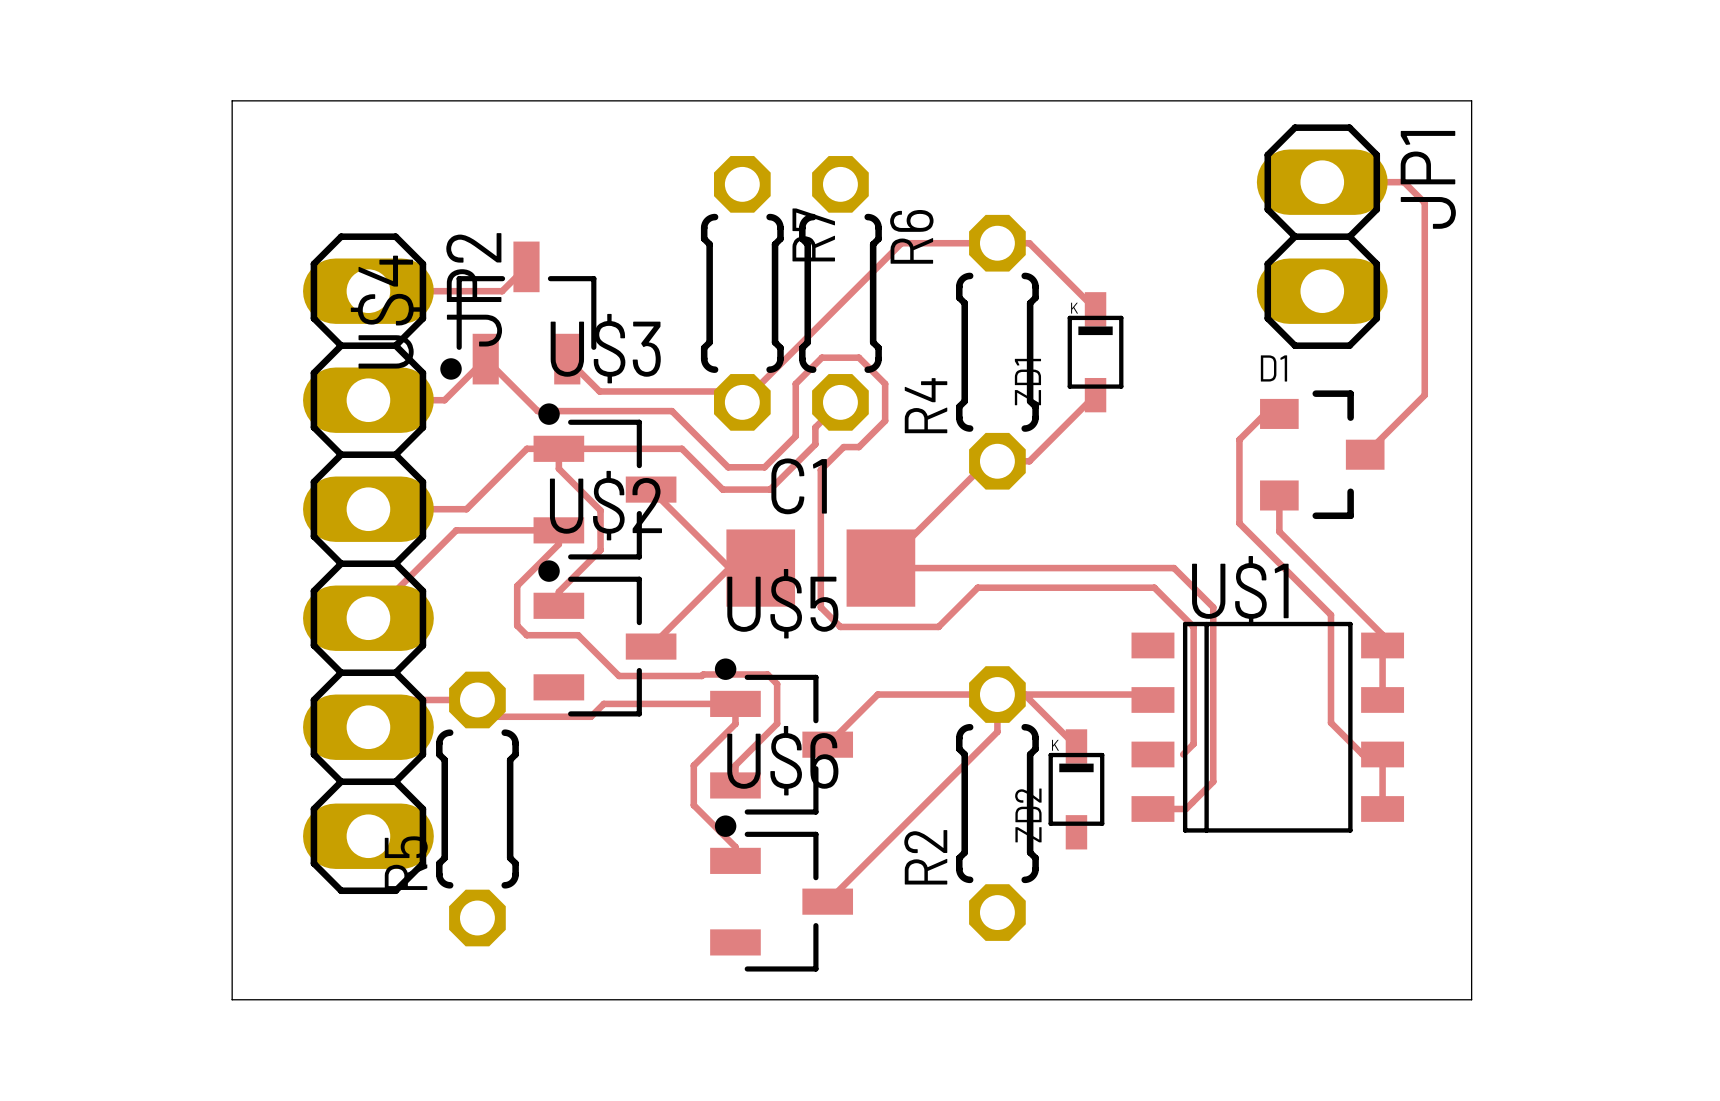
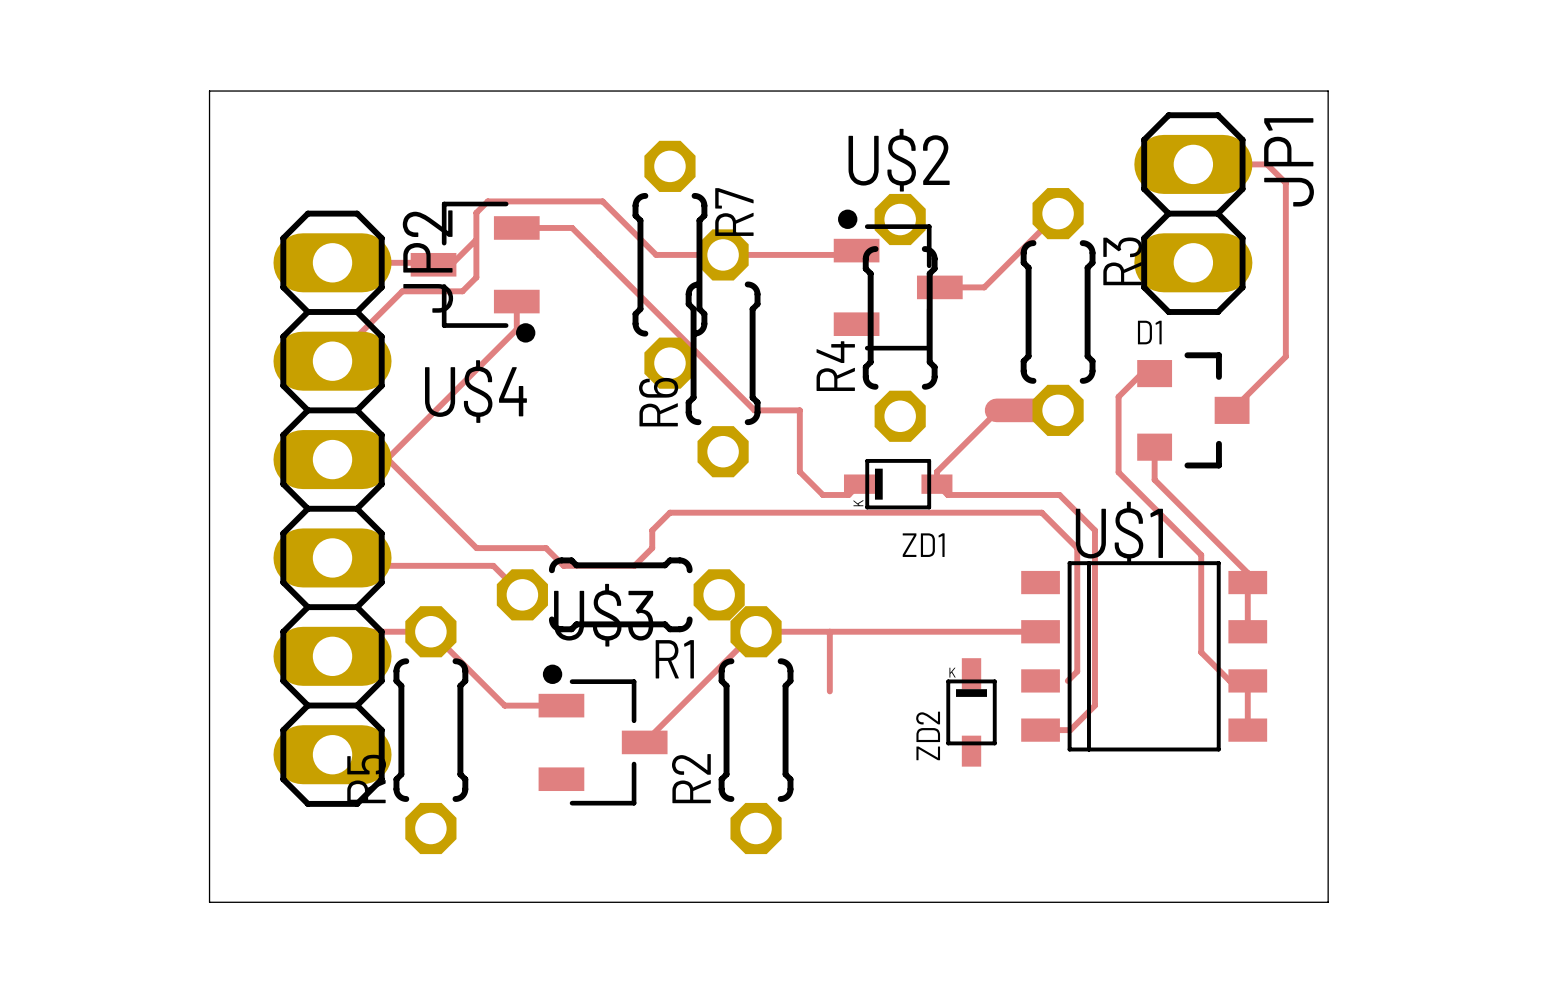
R6 name position: R6 (911, 236) -> R6 (658, 402)
track: none -> (1058, 213) (984, 287) (939, 287)
track: none -> (516, 227) (572, 227) (754, 410) (799, 410) (799, 471) (822, 494) (848, 494) (859, 484)
track: none -> (856, 250) (852, 254) (656, 254) (602, 201) (487, 201) (476, 212) (476, 277) (462, 291) (402, 291) (332, 361) (332, 354)
R6 position: (840, 293) -> (723, 353)
track: (1095, 309) (1029, 243) (901, 243) (742, 402) (731, 391) (599, 391) (567, 359) -> none
U$4 rotation: 0° (518, 312) -> 90° counterclockwise (475, 272)
track: none -> (516, 301) (516, 329) (386, 459)
R3: none -> (1058, 311)
ZD1 rotation: 0° (1095, 352) -> 90° counterclockwise (898, 484)
ZD1 position: (1095, 352) -> (898, 484)
track: (1095, 395) (1029, 461) (987, 461) (880, 568) -> (686, 512) (795, 512)
track: (368, 400) (444, 400) (485, 359) (537, 411) (671, 411) (728, 467) (764, 467) (795, 436) (795, 383) (821, 357) (858, 357) (885, 383) (885, 420) (858, 447) (843, 447) (820, 469) (820, 607) (840, 626) (938, 626) (977, 587) (1154, 587) (1193, 626) -> none
track: (840, 402) (815, 427) (815, 444) (770, 489) (722, 489) (681, 448) (526, 448) (466, 509) (429, 509) -> (669, 512) (652, 530) (652, 548) (634, 565) (563, 565) (546, 548) (476, 548) (388, 459)
track: (558, 448) (558, 468) (600, 510) (600, 550) (558, 591) (558, 605) -> none
track: none -> (1058, 410) (996, 410) (936, 471) (936, 484) (947, 494) (1059, 494) (1094, 530) (1094, 548)
U$3 position: (604, 481) -> (603, 735)
track: (651, 489) (729, 568) -> none
track: (729, 568) (651, 646) -> none
C1: (820, 568) -> none
track: (1154, 568) (1174, 568) (1213, 607) -> (1041, 512) (1077, 548) (1077, 565)
track: none -> (332, 557) (368, 557) (376, 565) (493, 565) (522, 594)
track: (368, 625) (368, 618) (456, 530) (558, 530) (558, 544) (517, 585) (517, 625) (526, 635) (578, 635) (619, 675) (767, 674) (777, 684) (777, 723) (735, 765) (735, 785) -> none
U$2 position: (604, 638) -> (898, 280)
R1: none -> (620, 594)
track: (997, 694) (997, 731) (827, 901) -> none
track: (1024, 694) (1076, 746) -> none
track: none -> (829, 631) (829, 691)
track: (1152, 699) (1147, 694) (877, 694) (827, 744) -> (1040, 631) (755, 631) (644, 742)
track: (494, 716) (590, 716) (603, 703) (735, 703) (735, 723) (693, 765) (693, 805) (735, 846) (735, 860) -> (446, 646) (504, 705) (561, 705)
U$5: (781, 736) -> none
R2 position: (997, 803) -> (756, 730)
U$6: (781, 893) -> none

